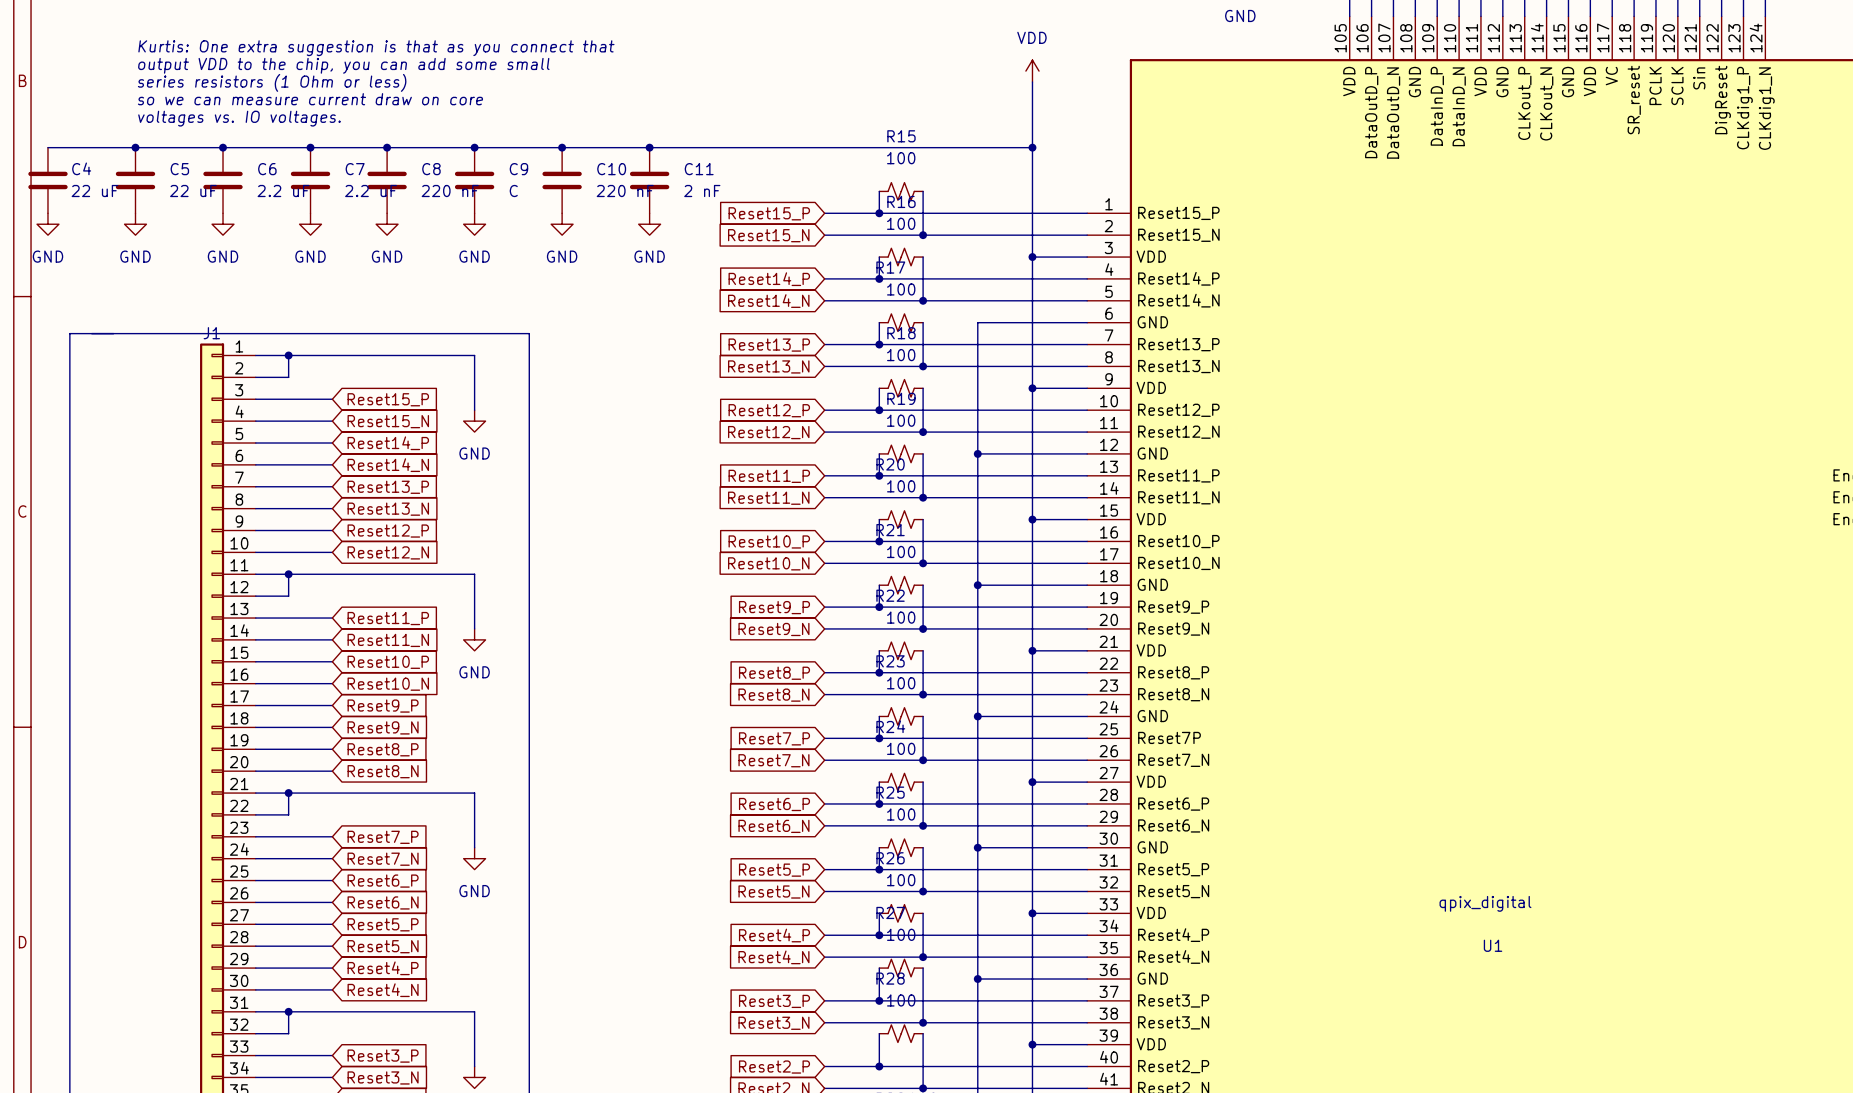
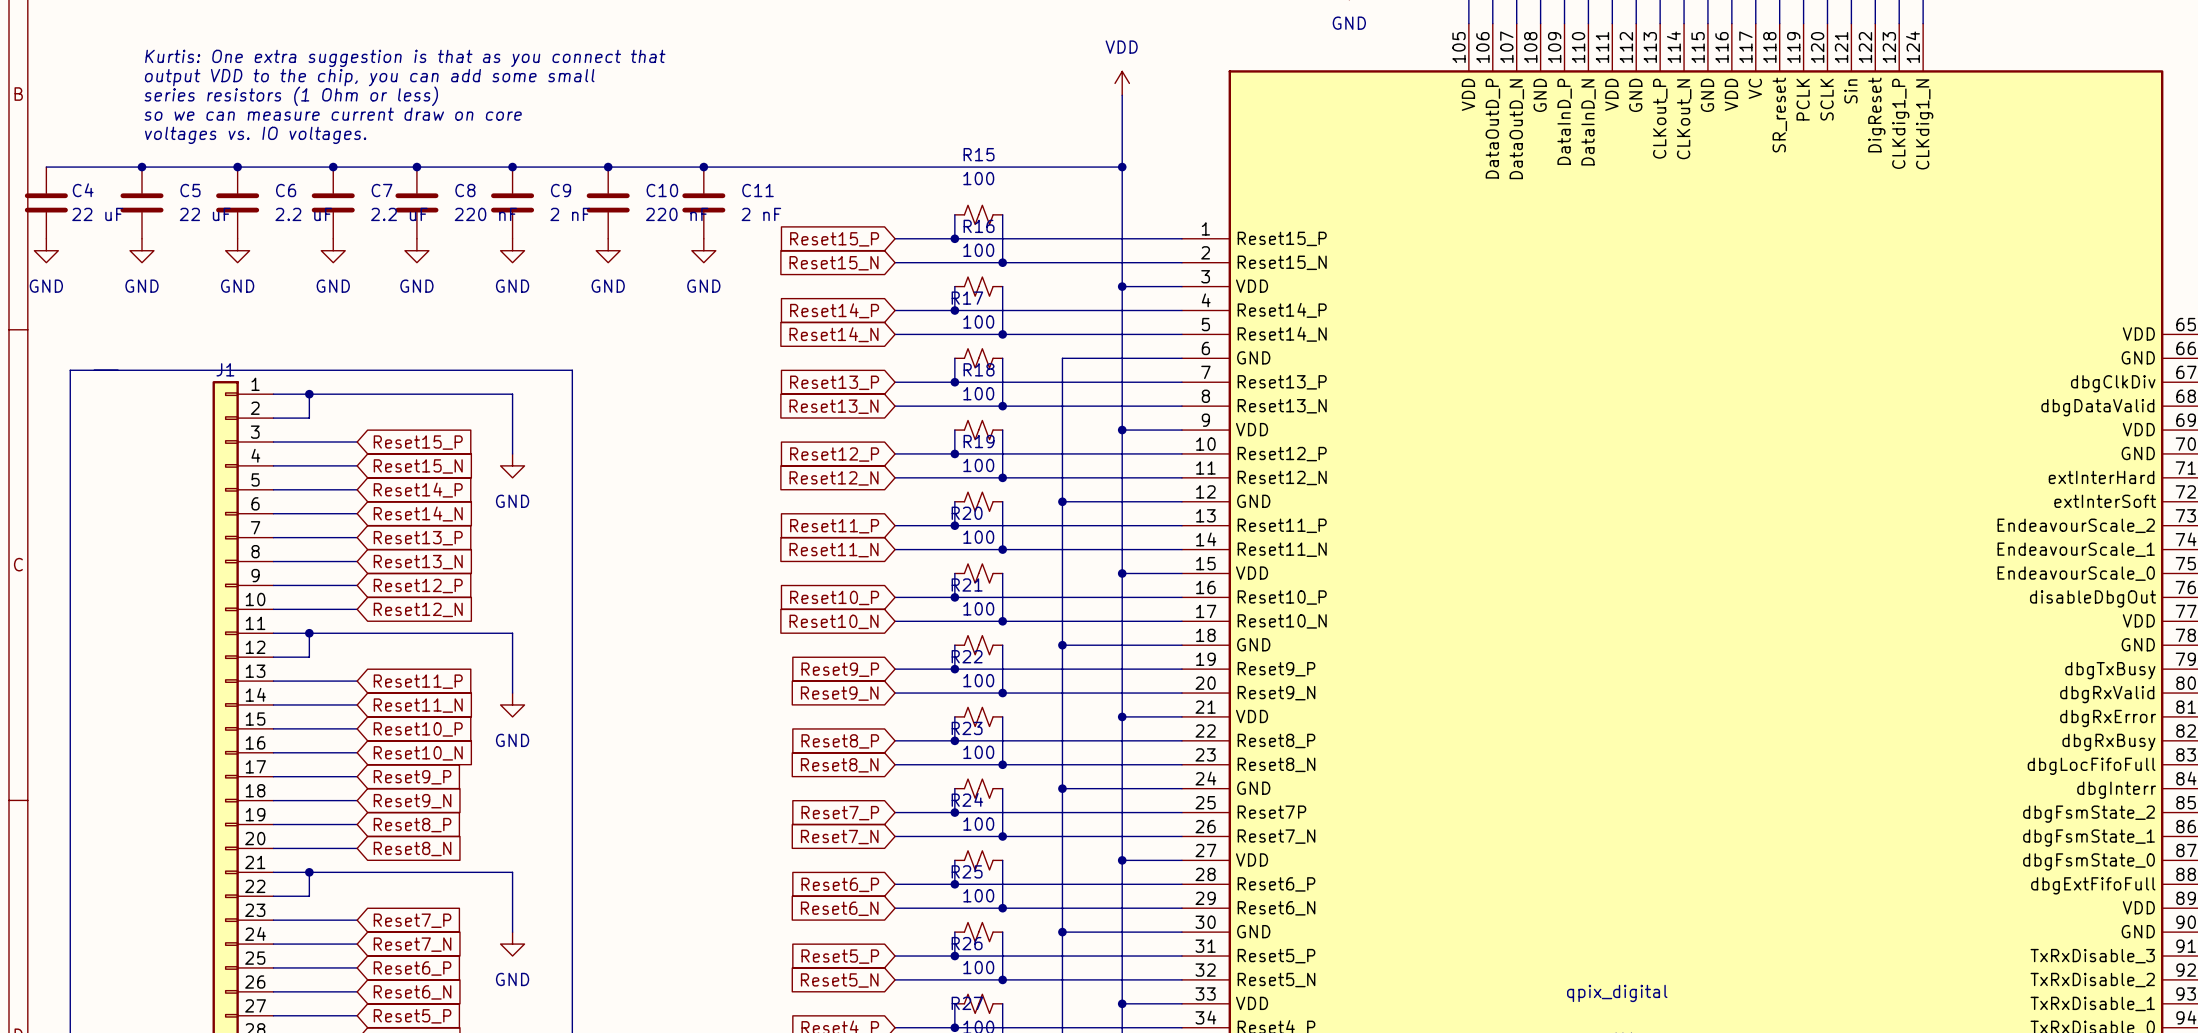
C9 value: C (513, 191) -> 2 nF (570, 214)

